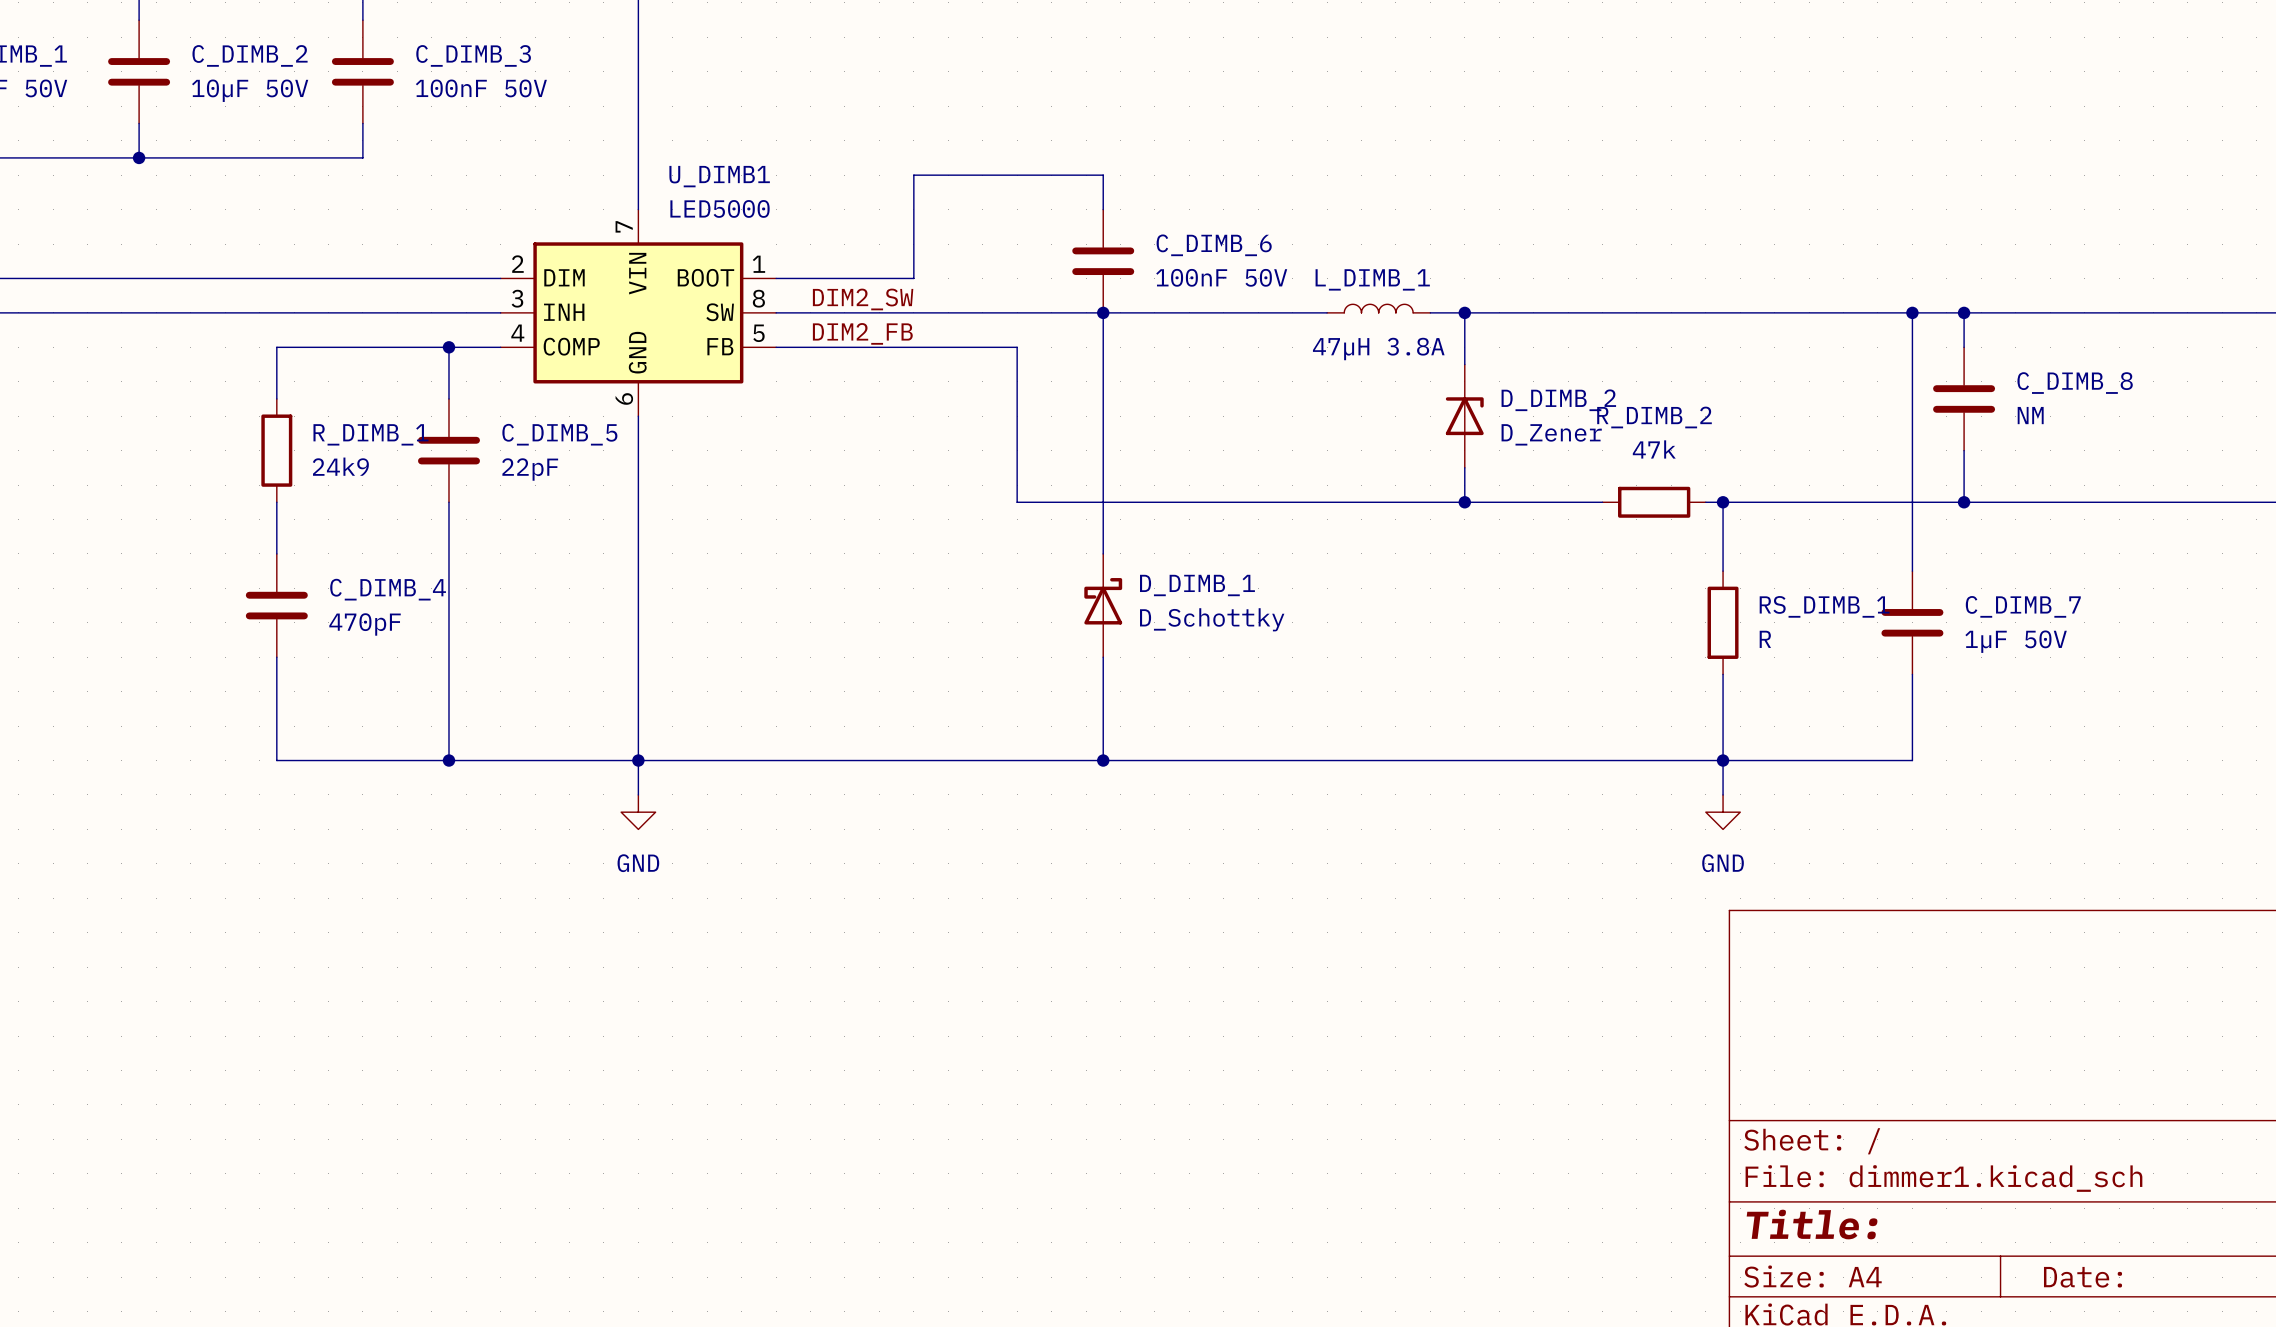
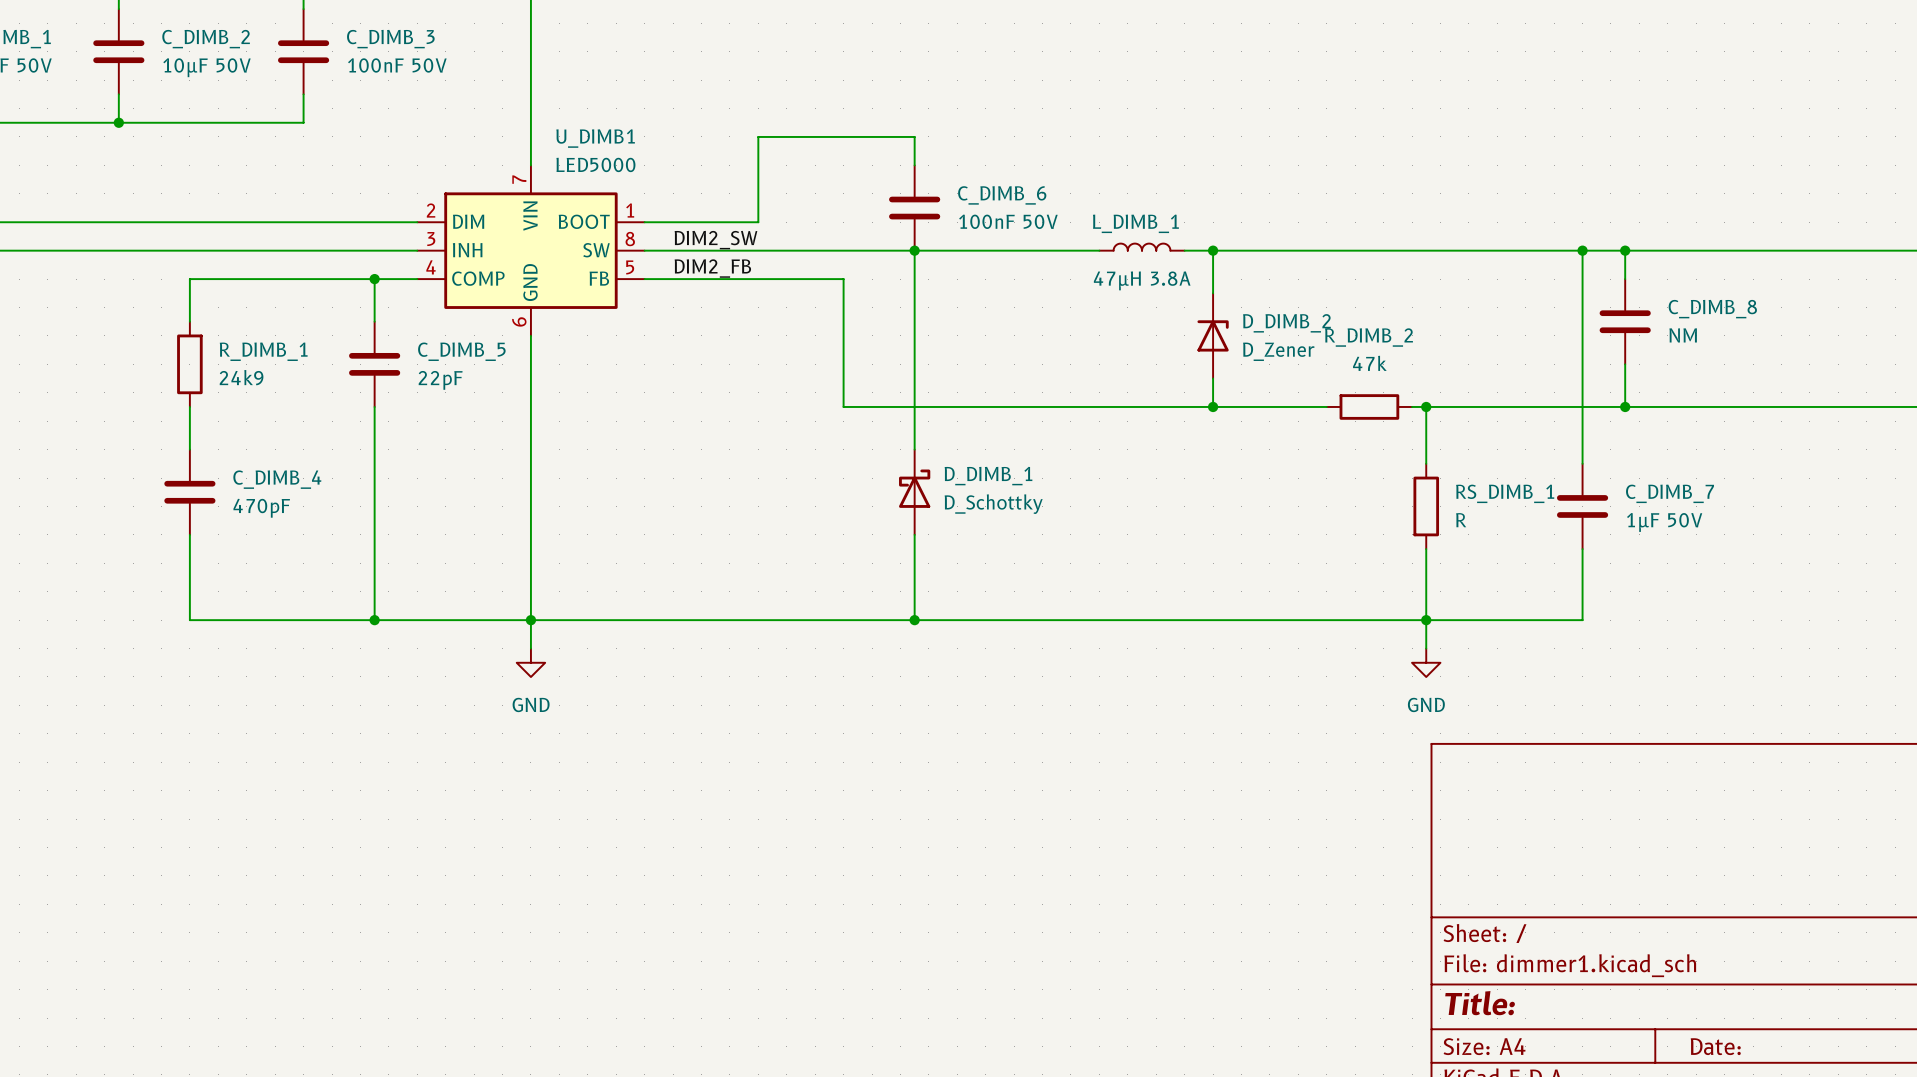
wire: (276, 347) (276, 398) -> (232, 279) (189, 279) (189, 321)
R_DIMB_1 position: (276, 450) -> (189, 364)
wire: (276, 502) (276, 553) -> (189, 406) (189, 449)
C_DIMB_4 position: (276, 605) -> (189, 492)
wire: (276, 657) (276, 760) -> (189, 534) (189, 620) (232, 620)

